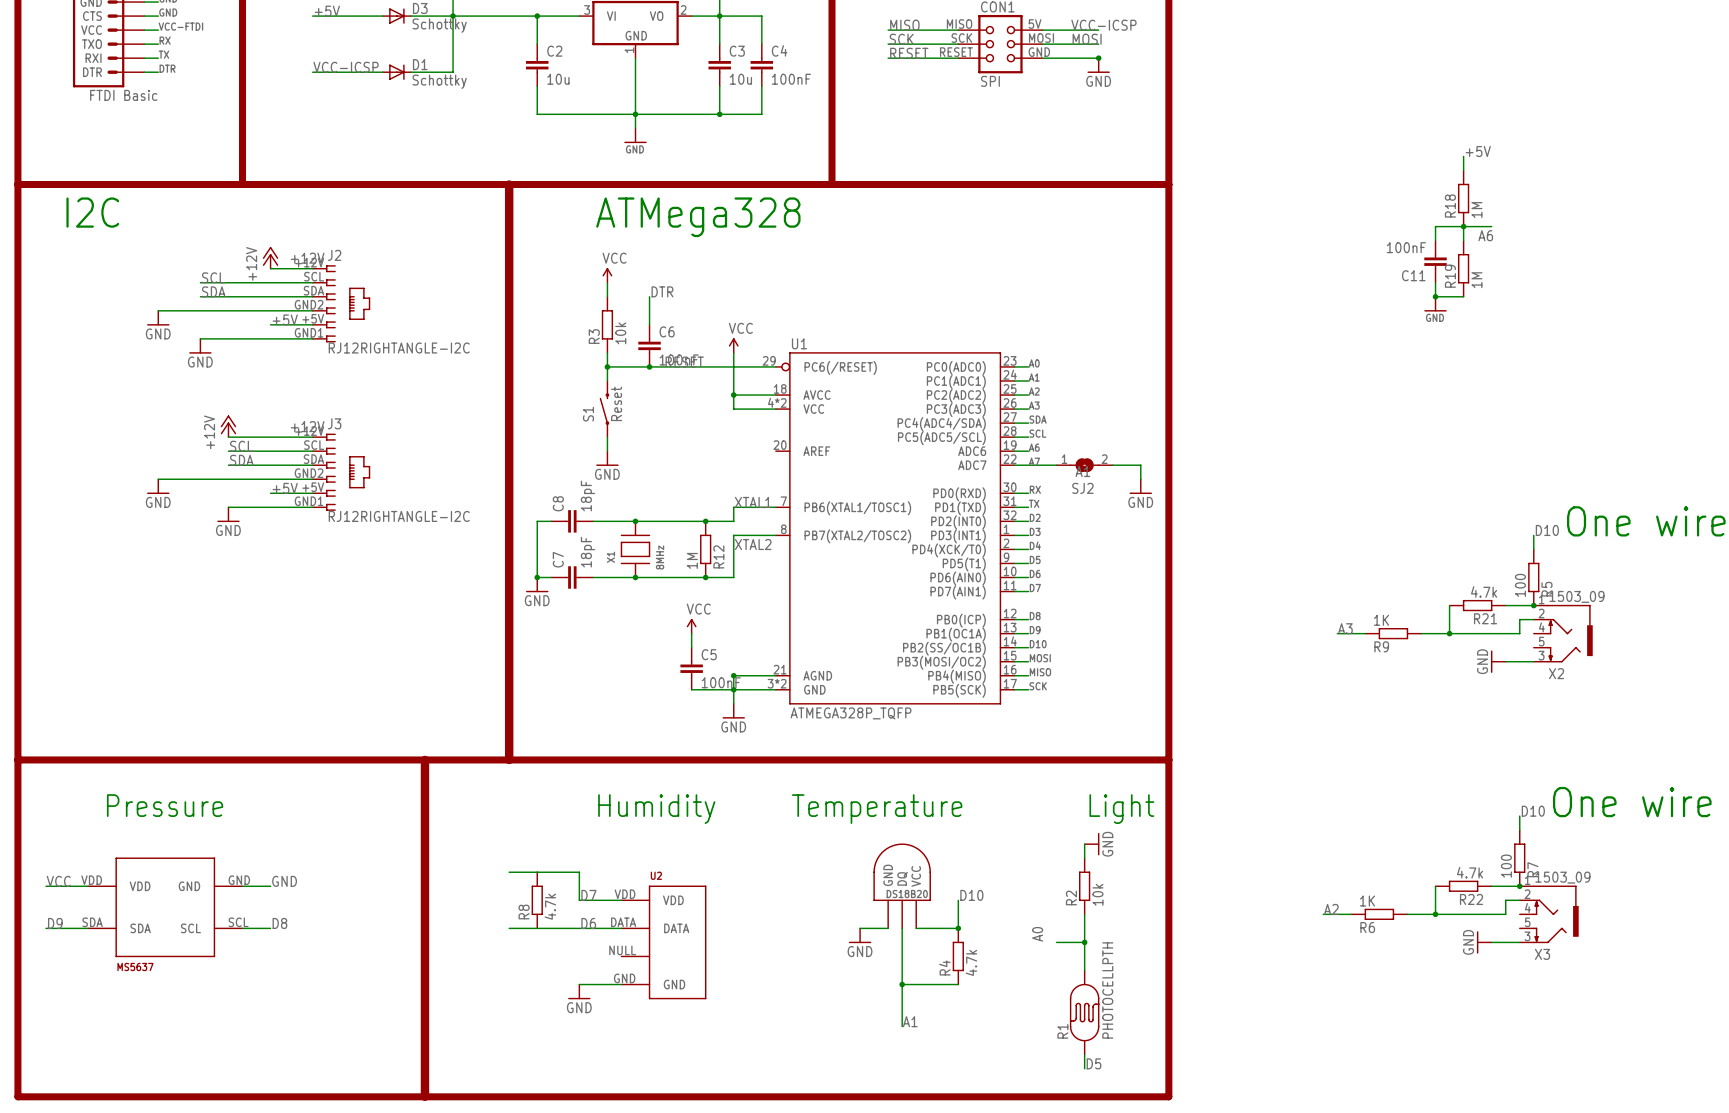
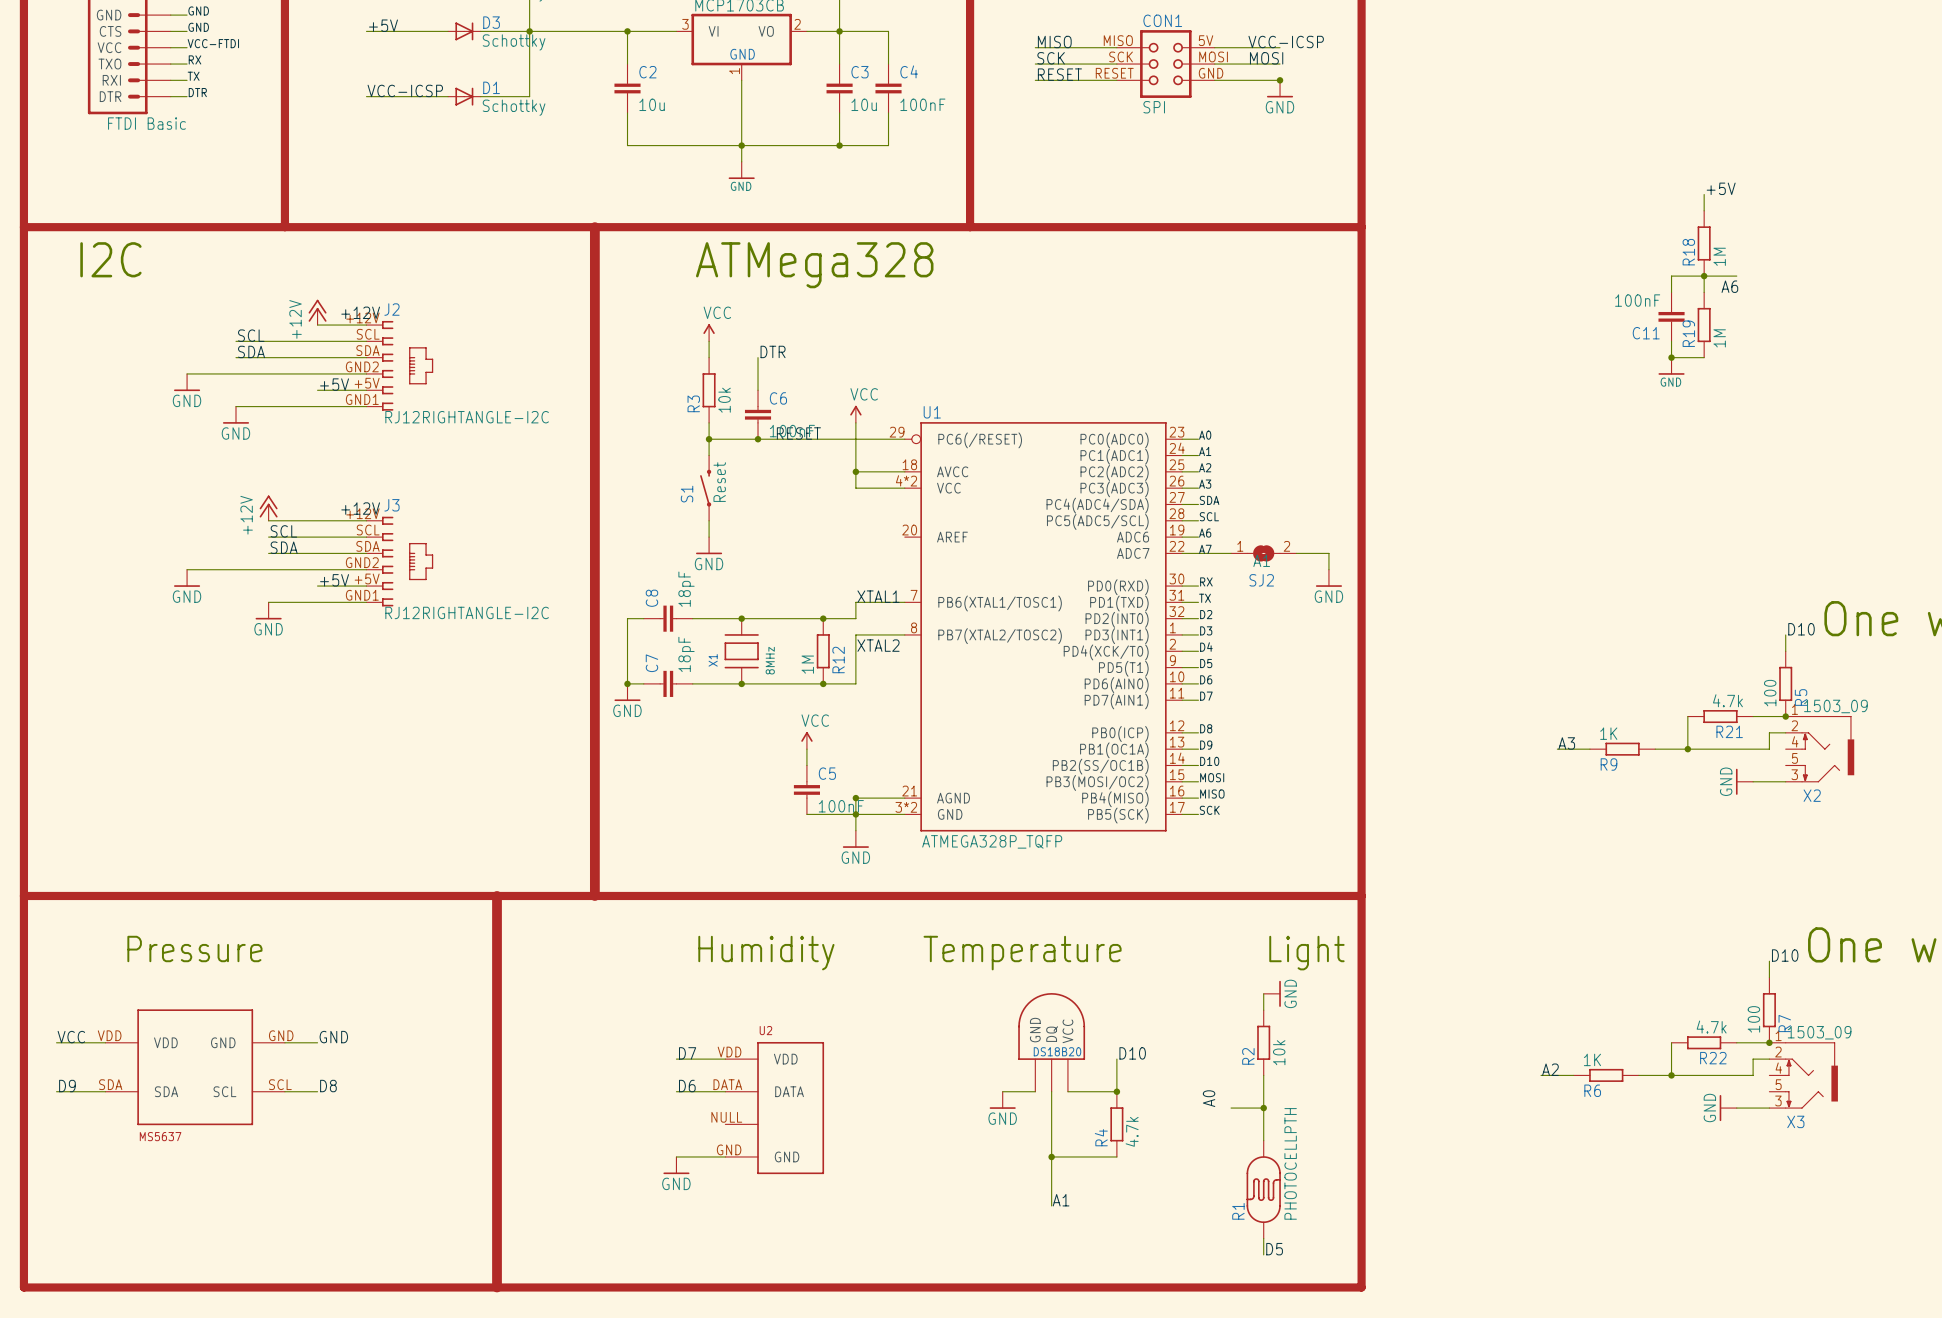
wire: (509, 872) (579, 872) (579, 900) -> none
R8: 4.7k (537, 900) -> none
wire: (509, 928) (579, 928) -> none

